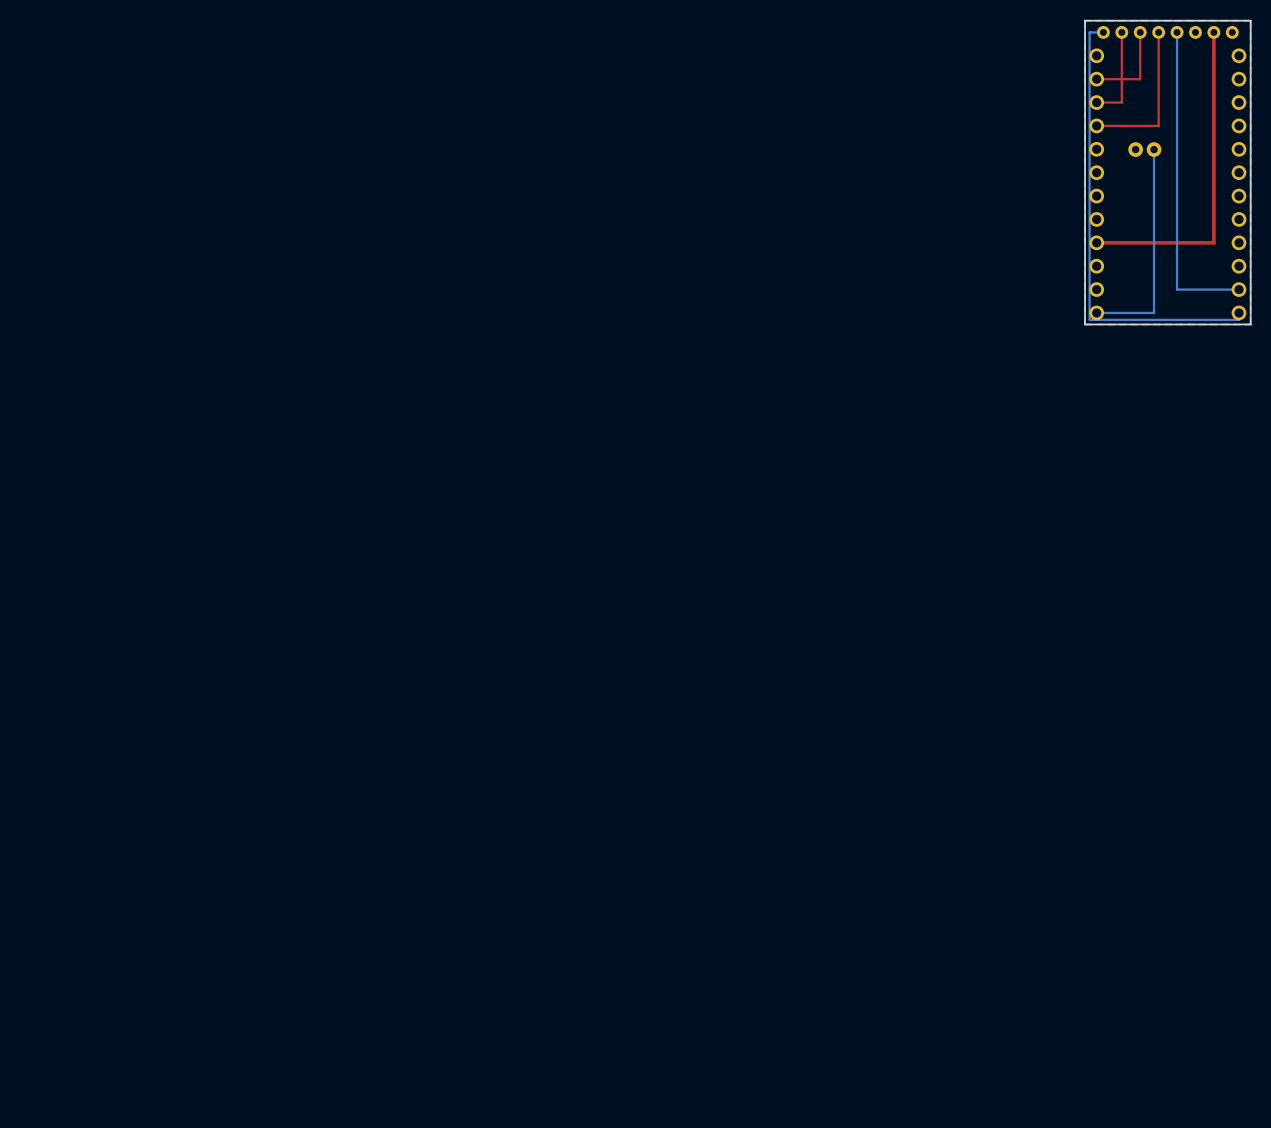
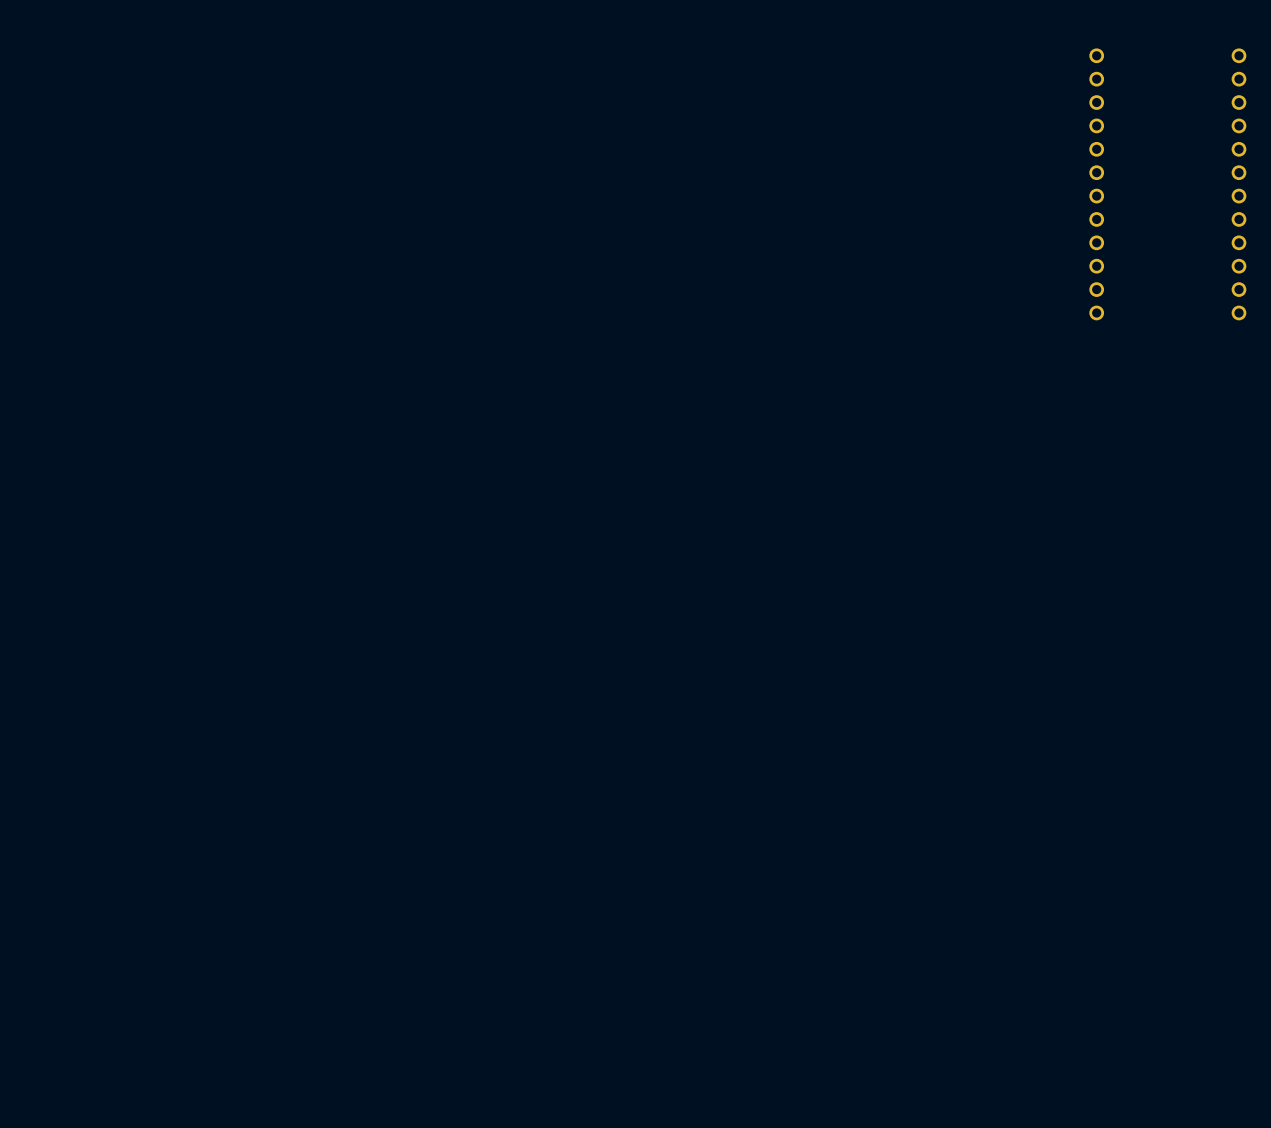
board edge: (1250, 20) (1085, 20) (1085, 324) (1250, 324) (1250, 20) -> none
bottom track: (1103, 32) (1089, 32) (1089, 319) (1239, 319) (1239, 312) -> none
top track: (1121, 32) (1121, 102) (1096, 102) -> none
top track: (1140, 32) (1140, 79) (1096, 79) -> none
top track: (1158, 32) (1158, 125) (1096, 125) -> none
part: (1167, 32) -> none
bottom track: (1177, 32) (1177, 289) (1239, 289) -> none
top track: (1213, 32) (1213, 242) (1096, 242) -> none
part: (1144, 149) -> none
bottom track: (1154, 149) (1154, 312) (1096, 312) -> none

